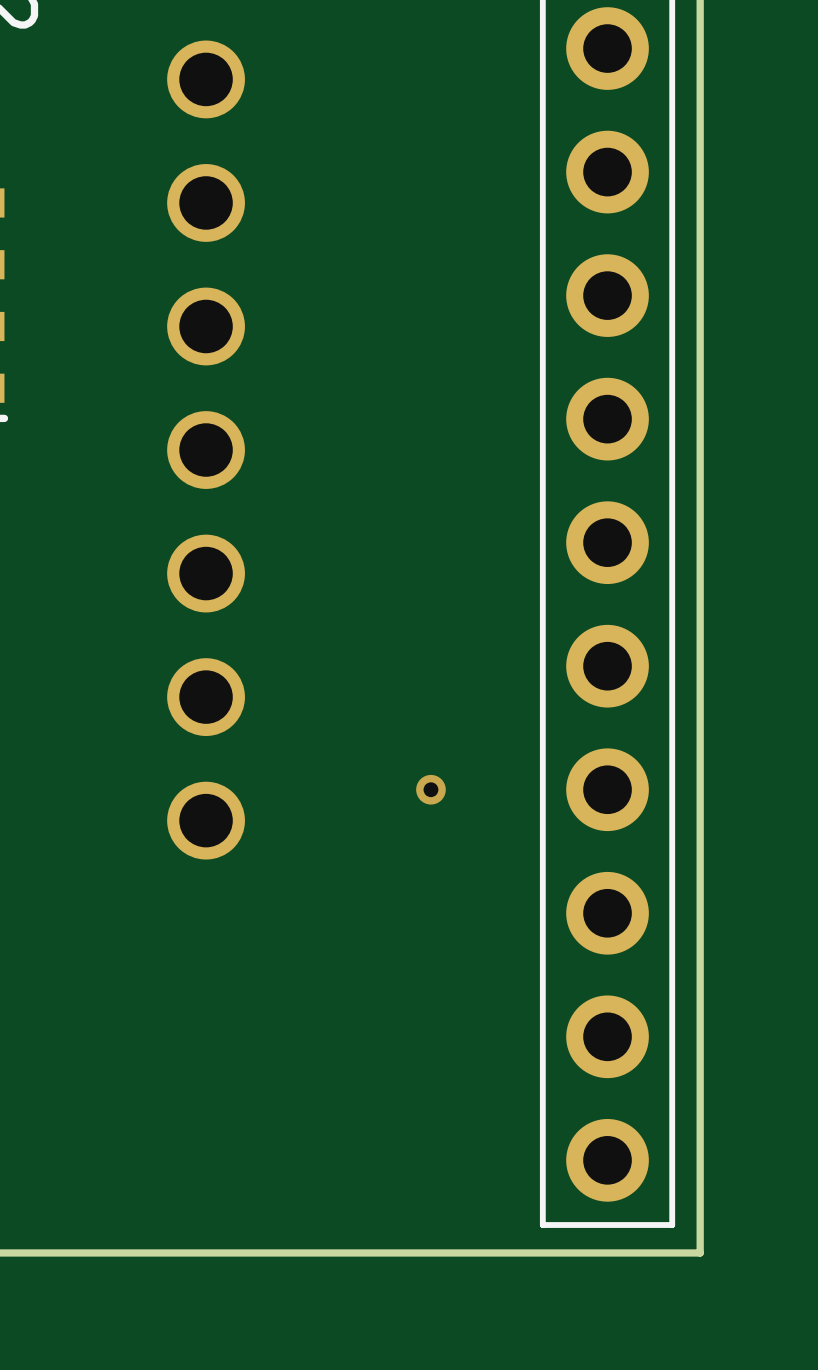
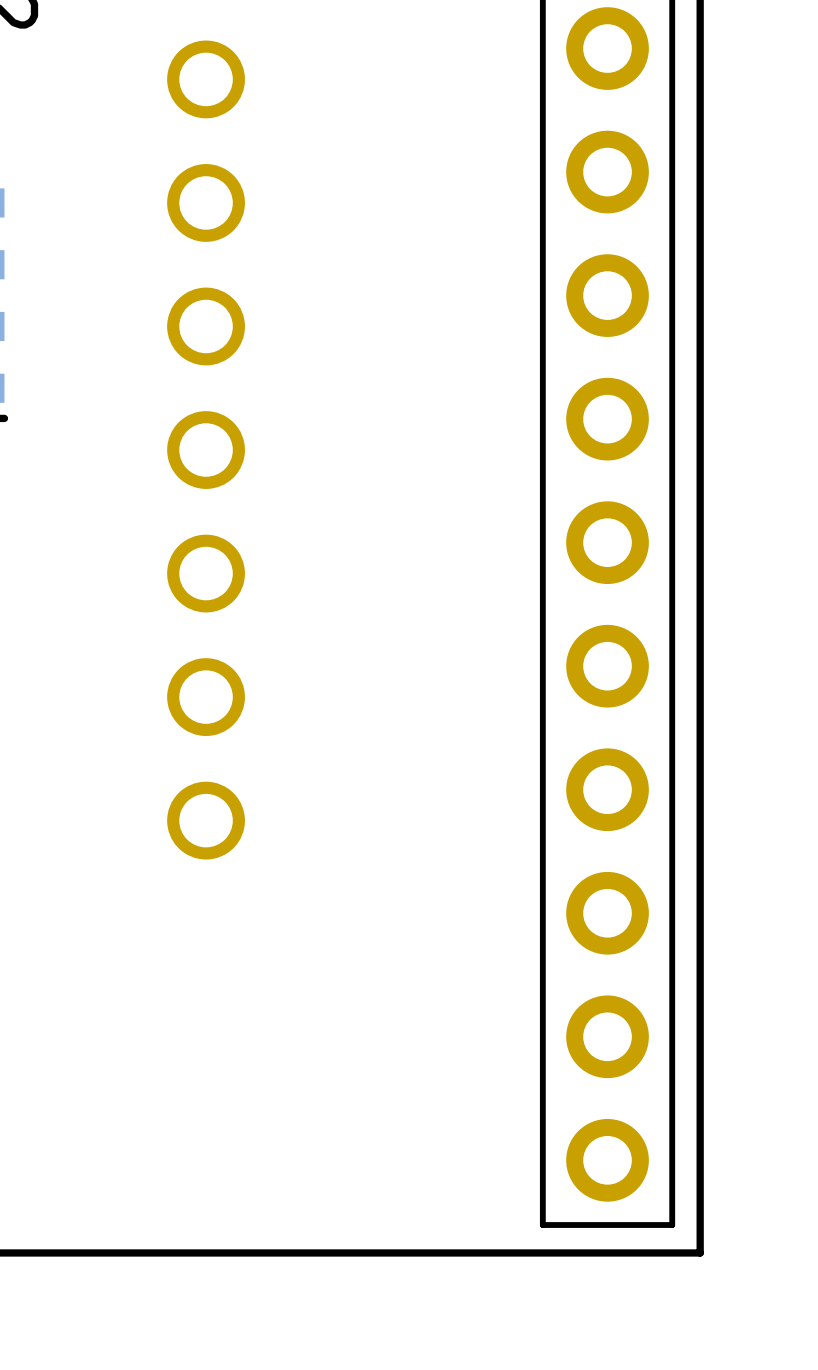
via: (430, 789) -> none

